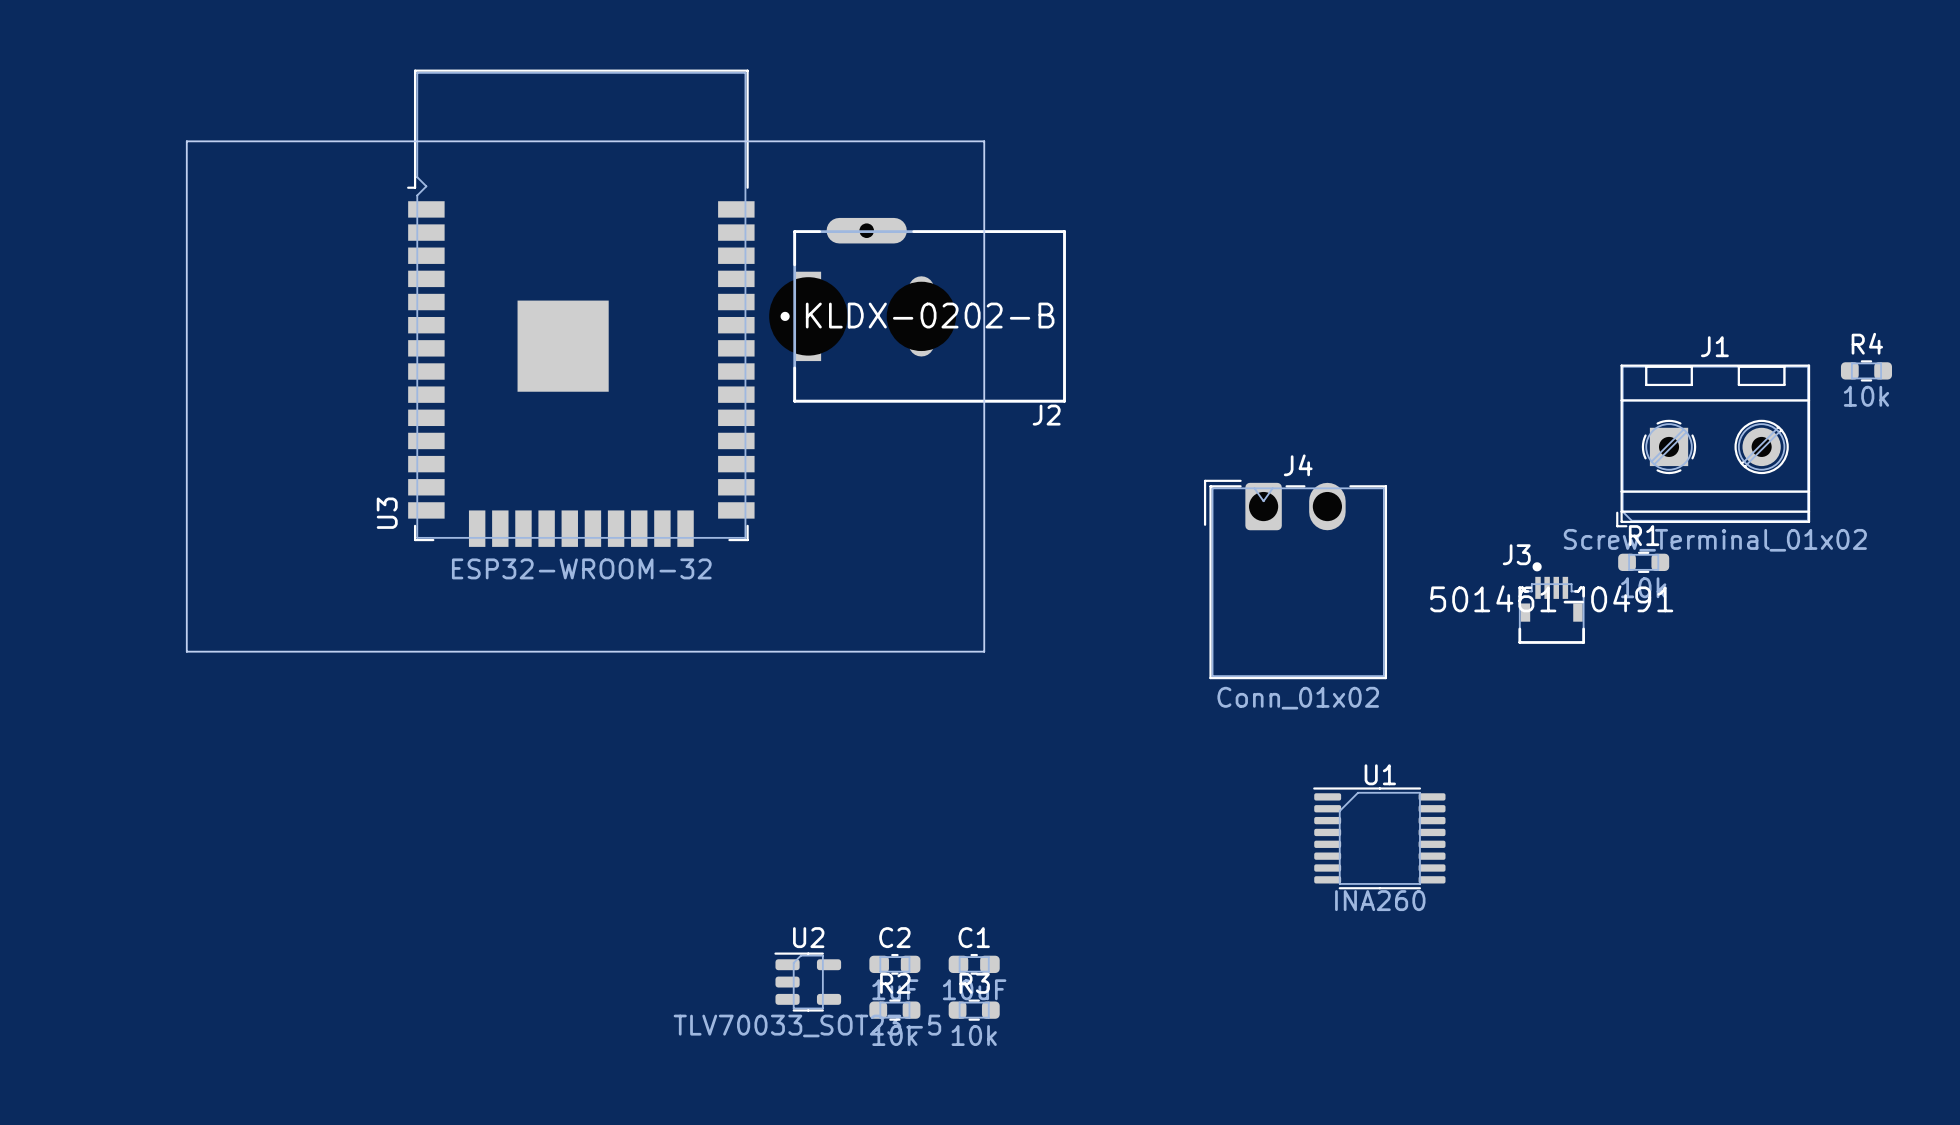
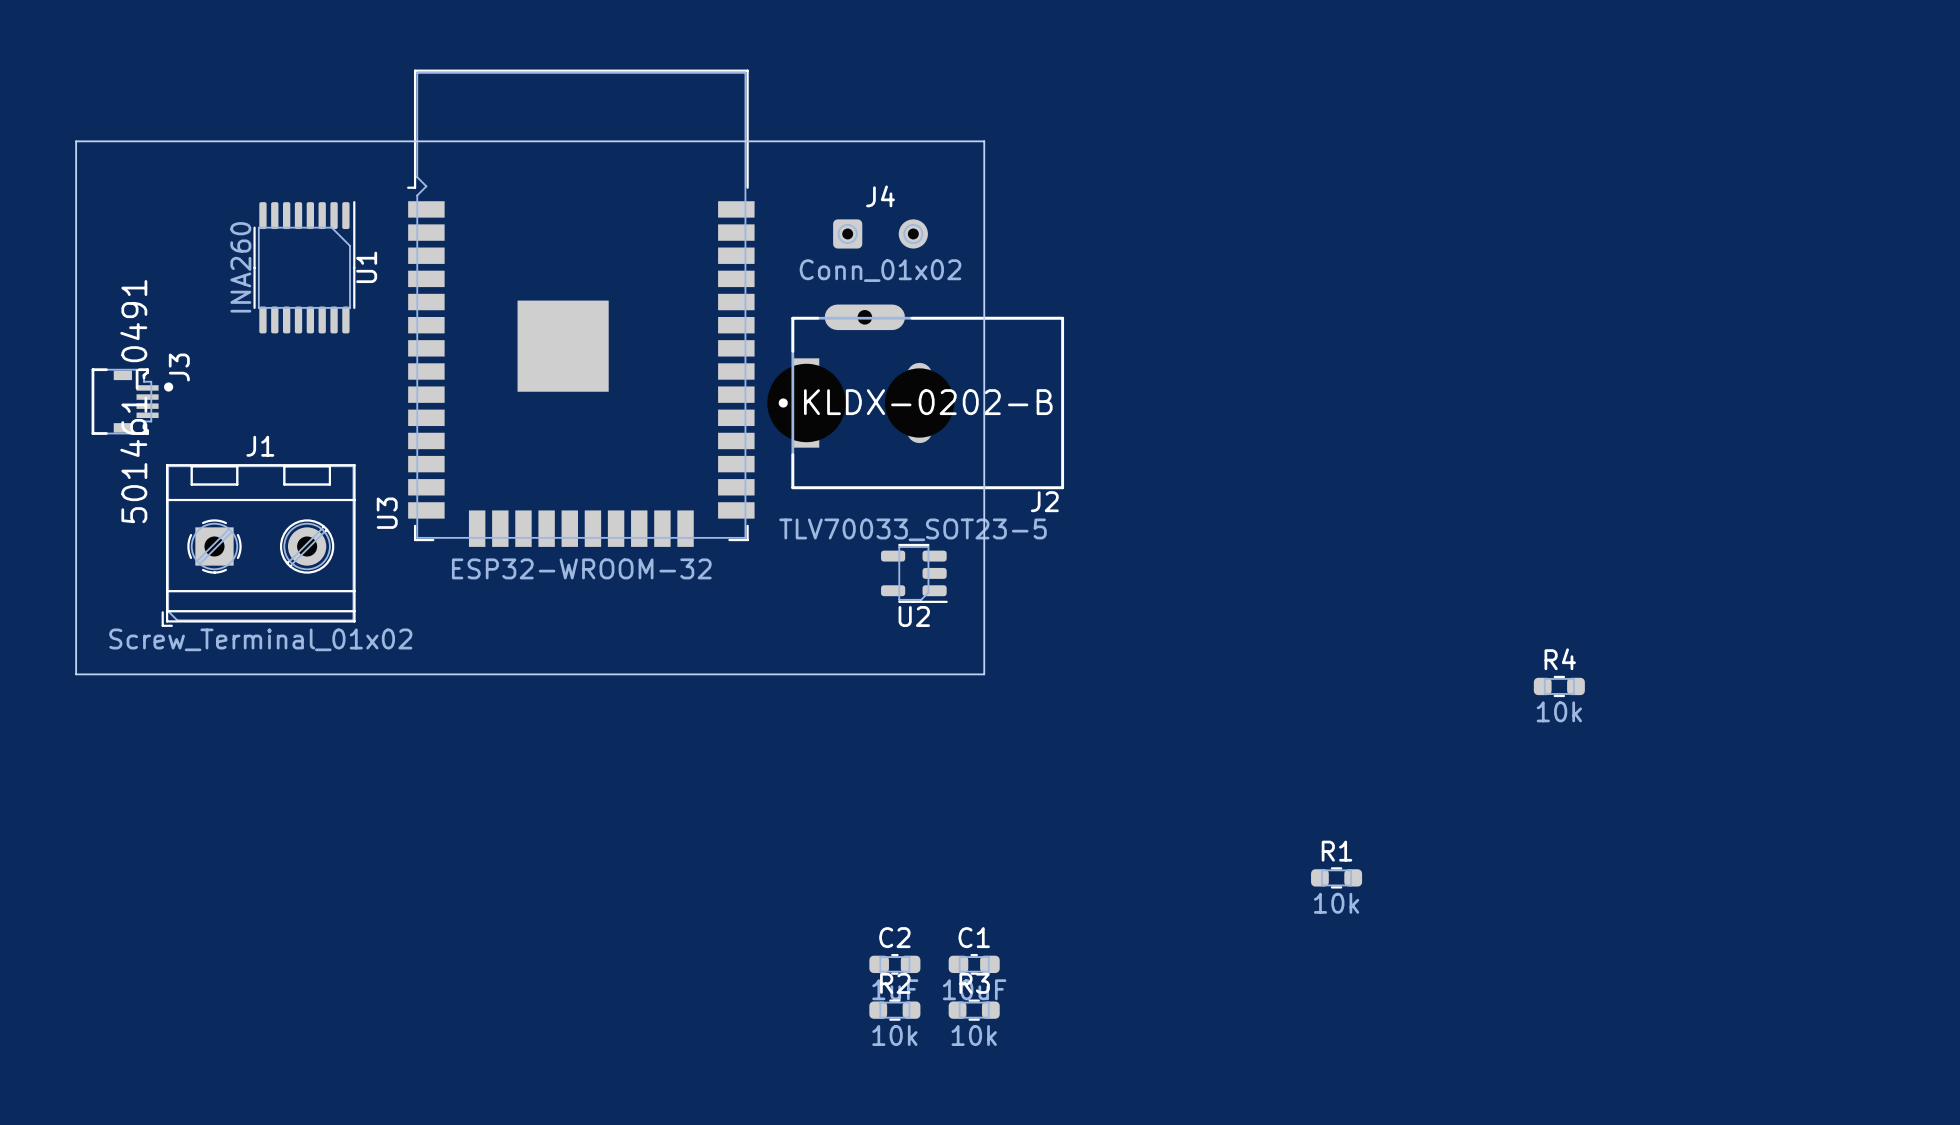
board edge: (186, 141) (186, 651) (984, 651) -> (186, 141) (76, 141) (76, 674) (984, 674) (984, 651)
J2 position: (917, 310) -> (915, 396)
R4 position: (1866, 370) -> (1559, 686)
J1 position: (1713, 445) -> (258, 545)
J4 name position: J4 (1298, 465) -> J4 (880, 196)
J4 footprint: [1203, 479, 1388, 680] -> [833, 219, 928, 249]
R1 position: (1643, 562) -> (1336, 877)
J3 rotation: 0° (1551, 603) -> 90° clockwise (132, 401)
J3 position: (1551, 603) -> (132, 401)
J4 value position: Conn_01x02 (1298, 698) -> Conn_01x02 (880, 270)
U1 rotation: 0° (1379, 838) -> 90° clockwise (304, 267)
U1 position: (1379, 838) -> (304, 267)
U2 rotation: 0° (807, 982) -> 180° (914, 573)
U2 position: (807, 982) -> (914, 573)

